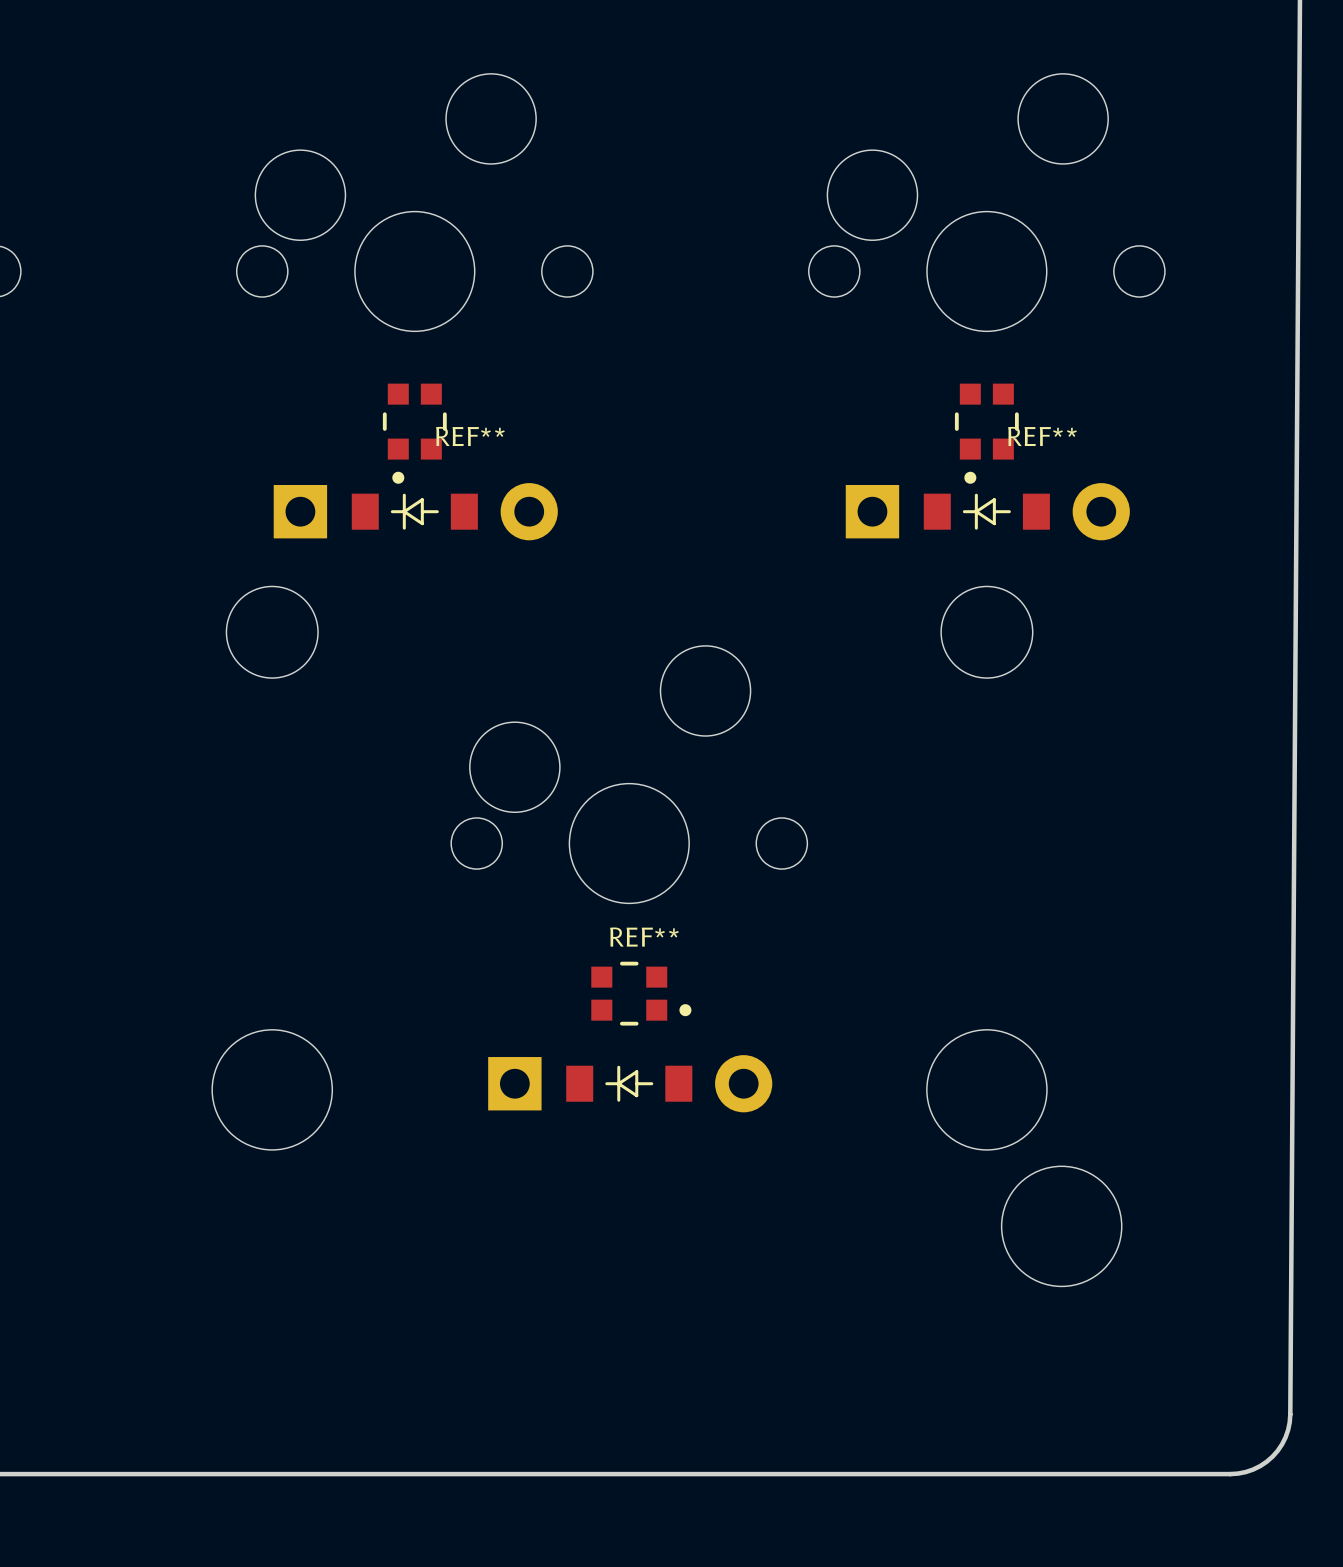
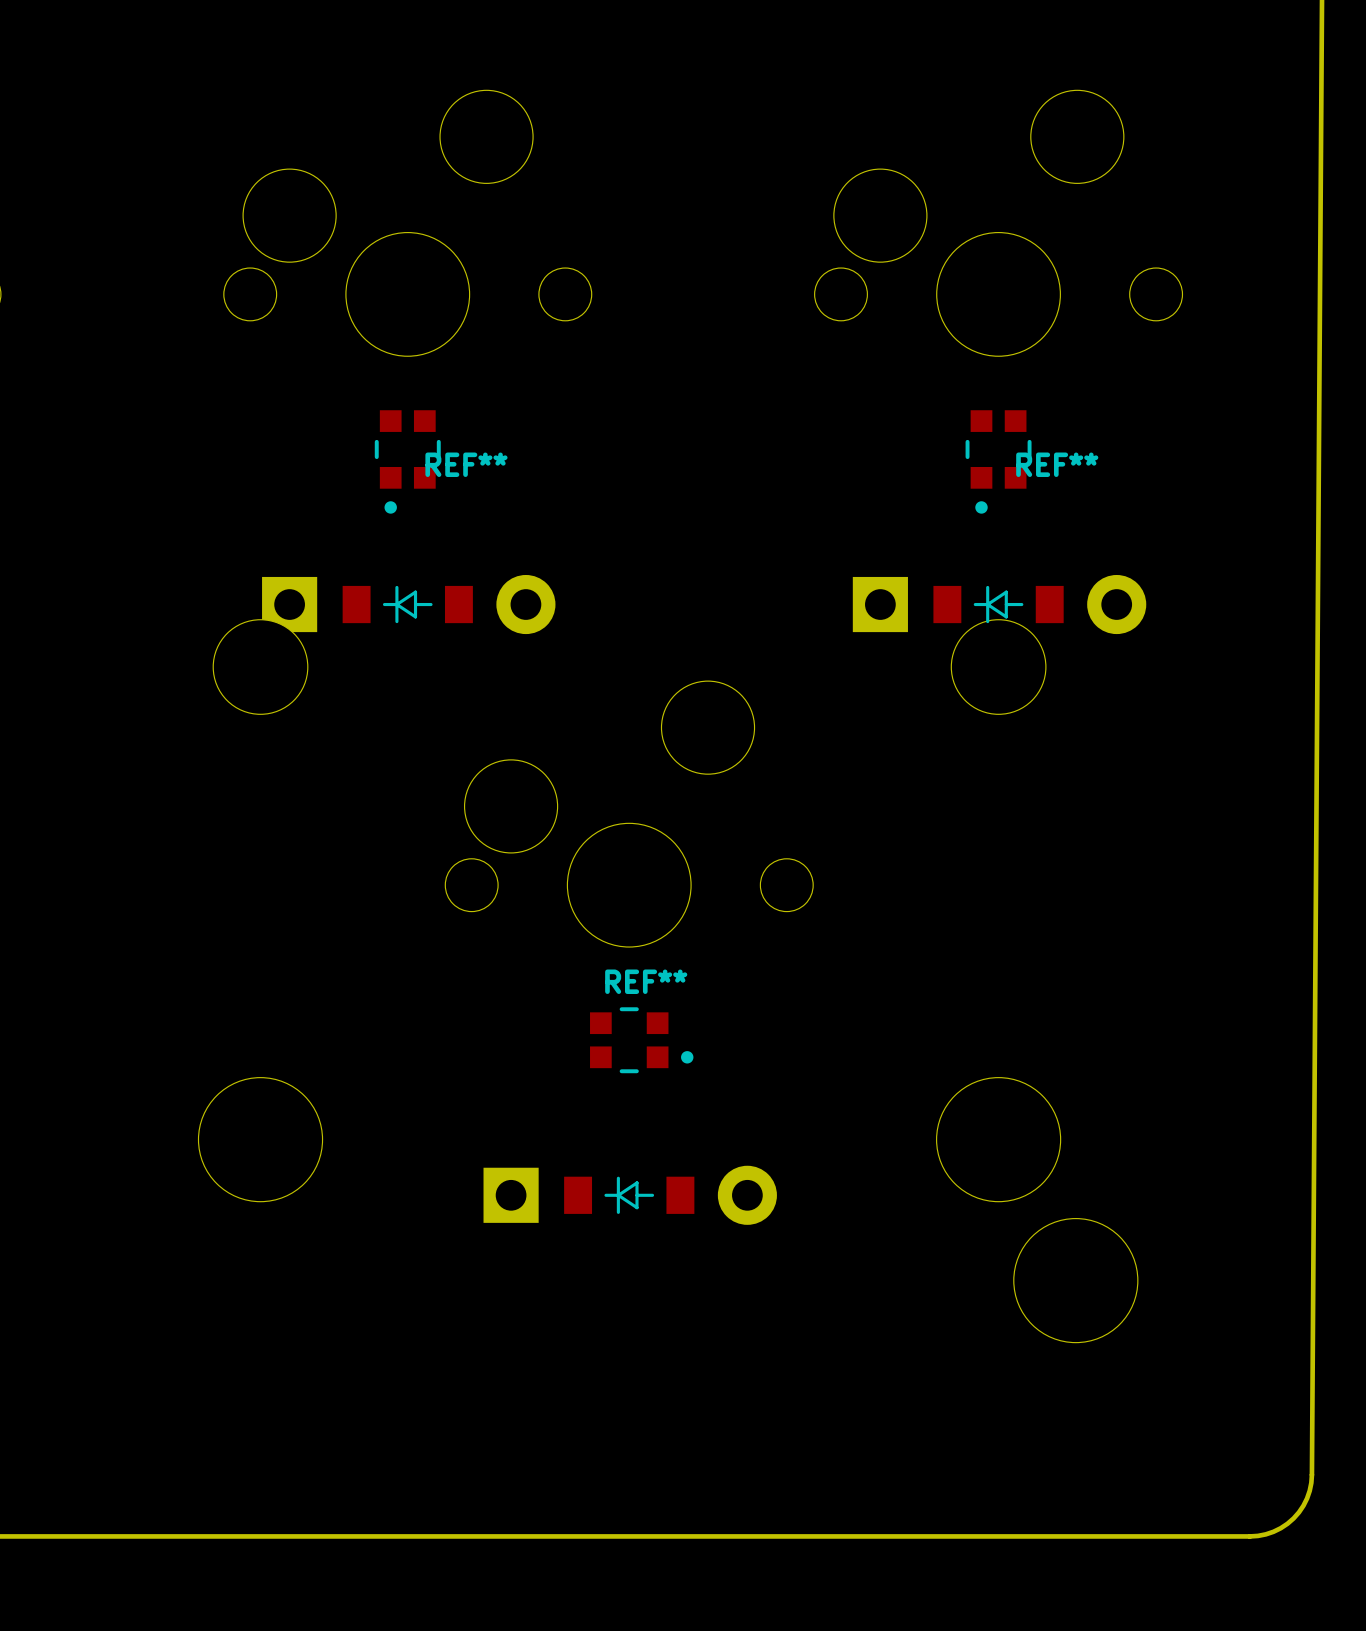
part position: (415, 511) -> (408, 604)
part position: (987, 511) -> (999, 604)
part position: (630, 1083) -> (630, 1195)

